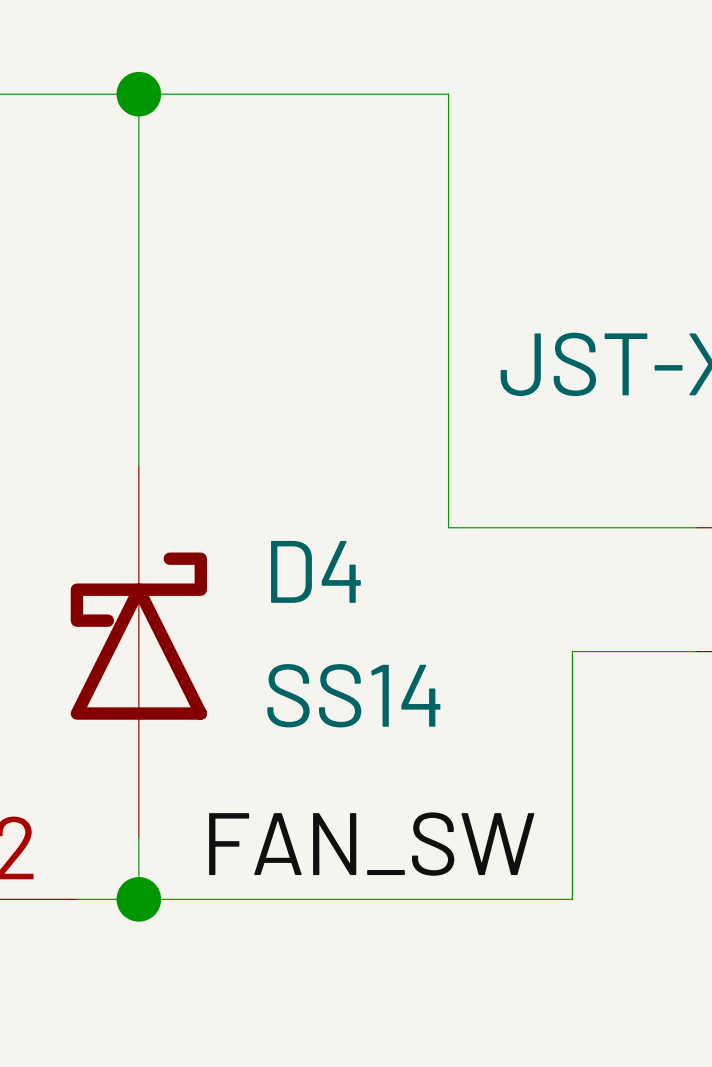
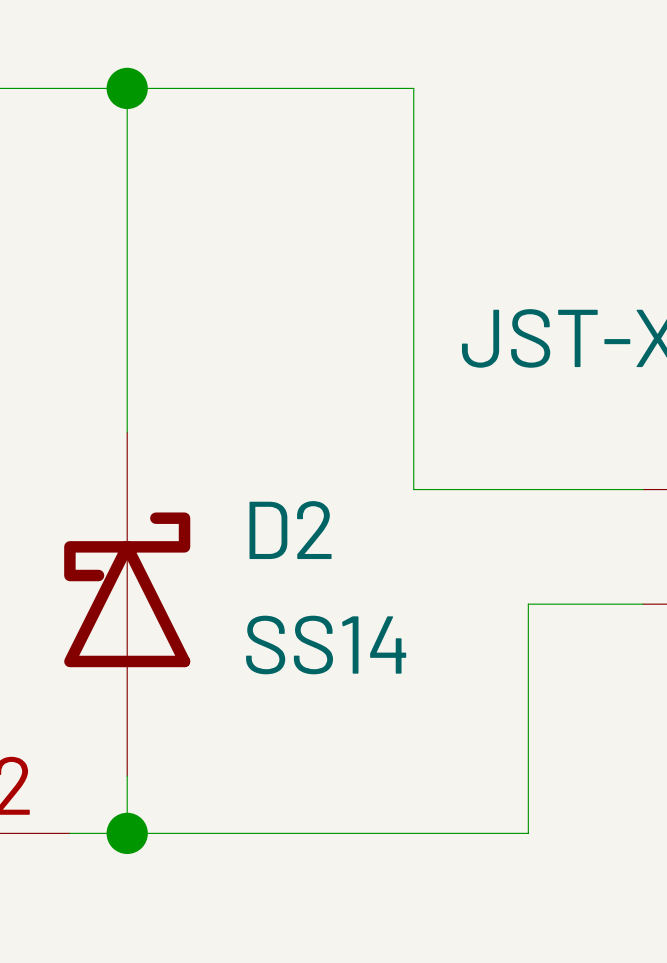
D4 name: D4 (315, 571) -> D2 (290, 530)
label: FAN_SW (371, 844) -> none

